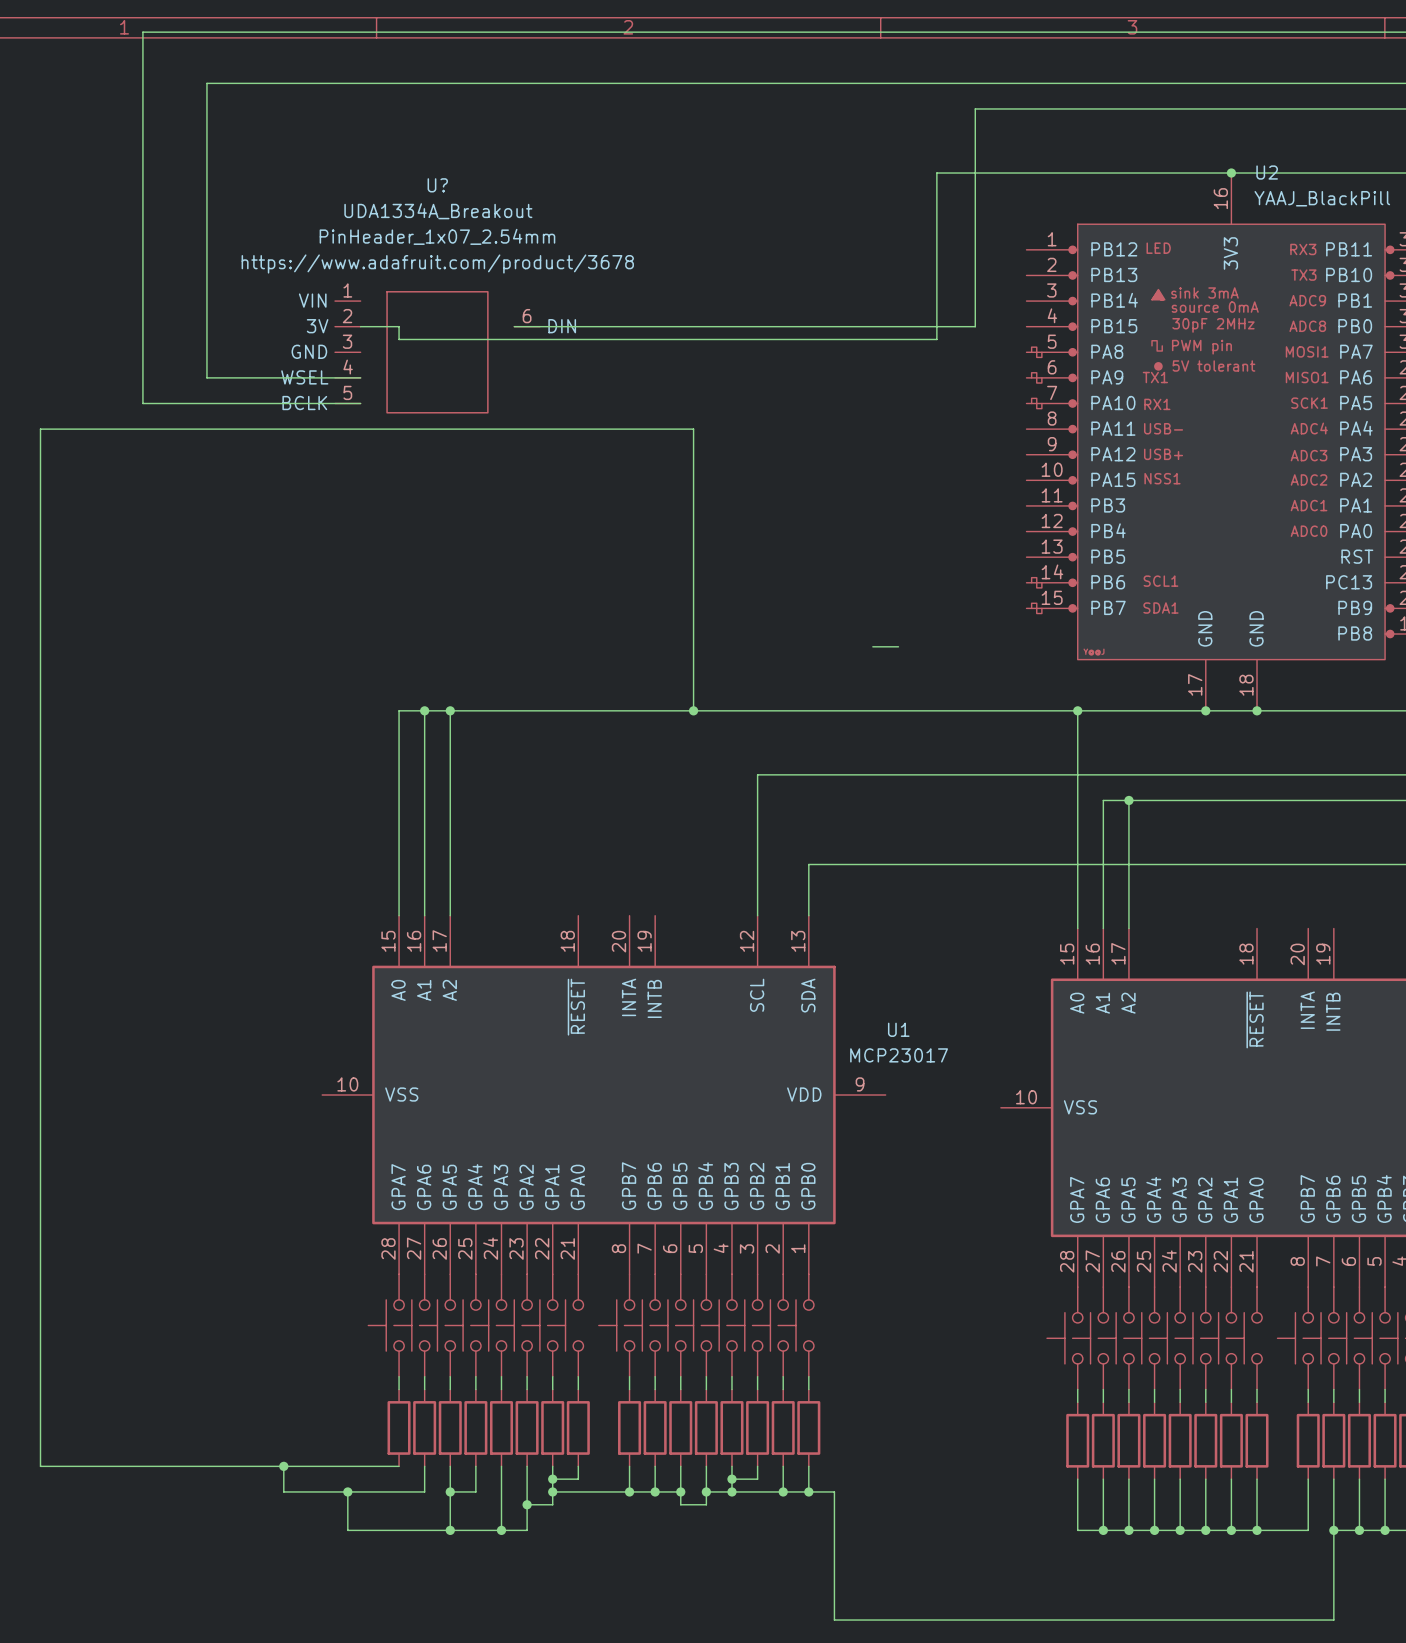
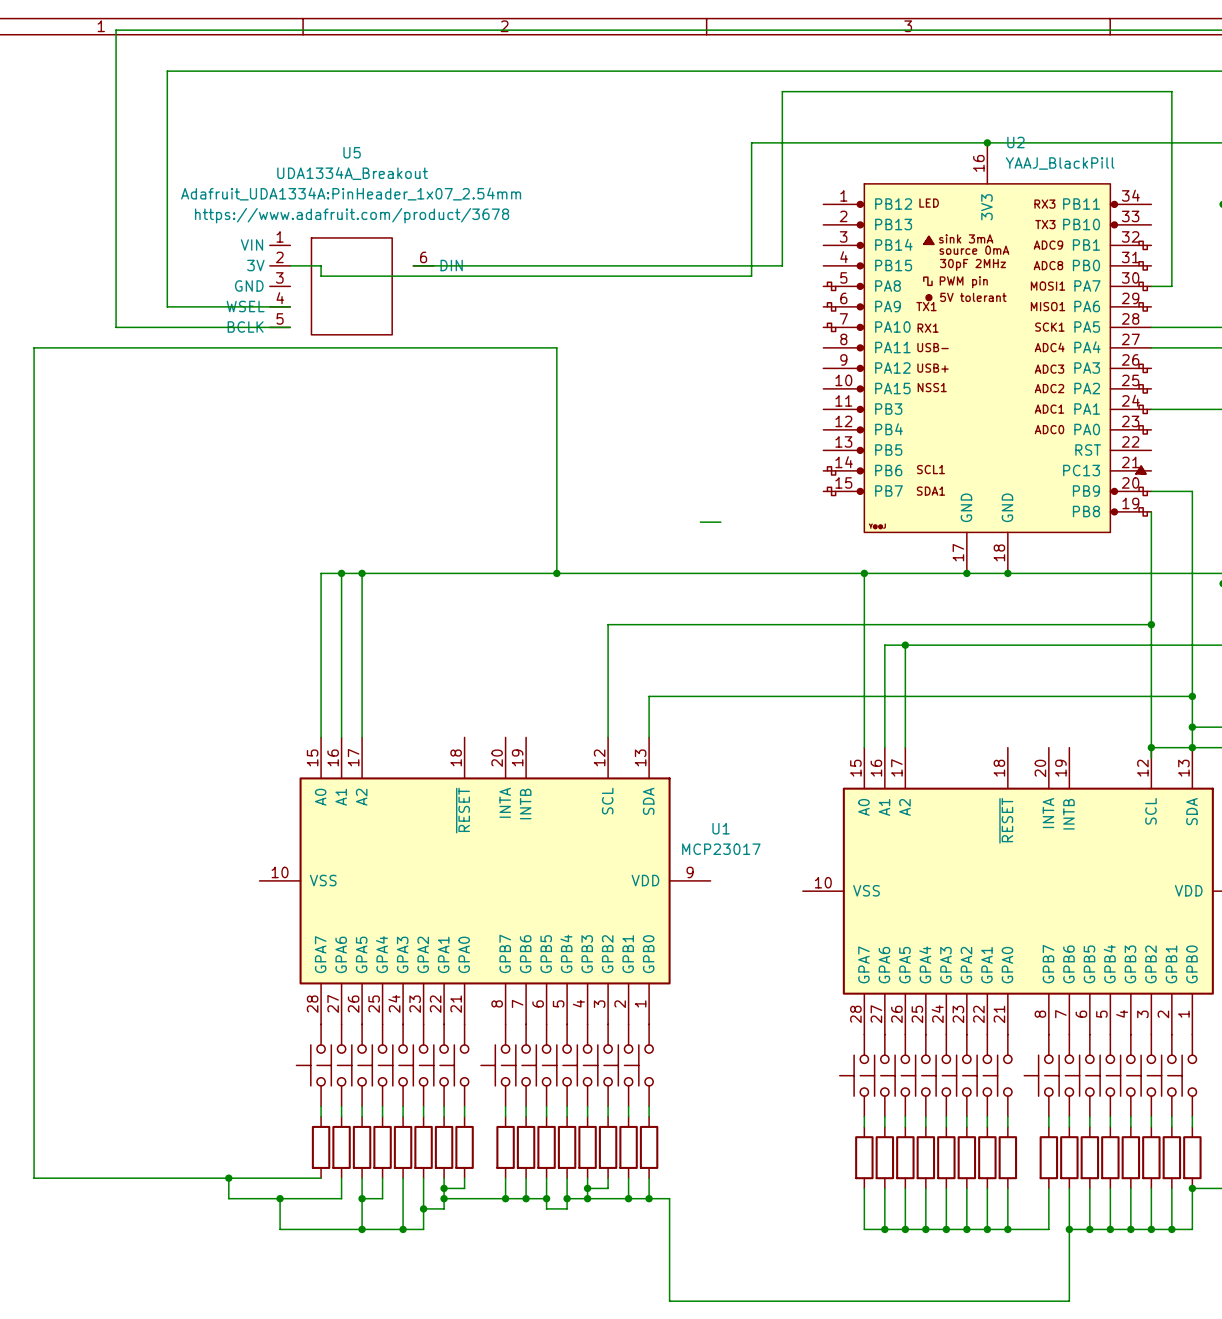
U? name: U? (437, 185) -> U5 (352, 152)
U? text: PinHeader_1x07_2.54mm (437, 236) -> Adafruit_UDA1334A:PinHeader_1x07_2.54mm (351, 193)

